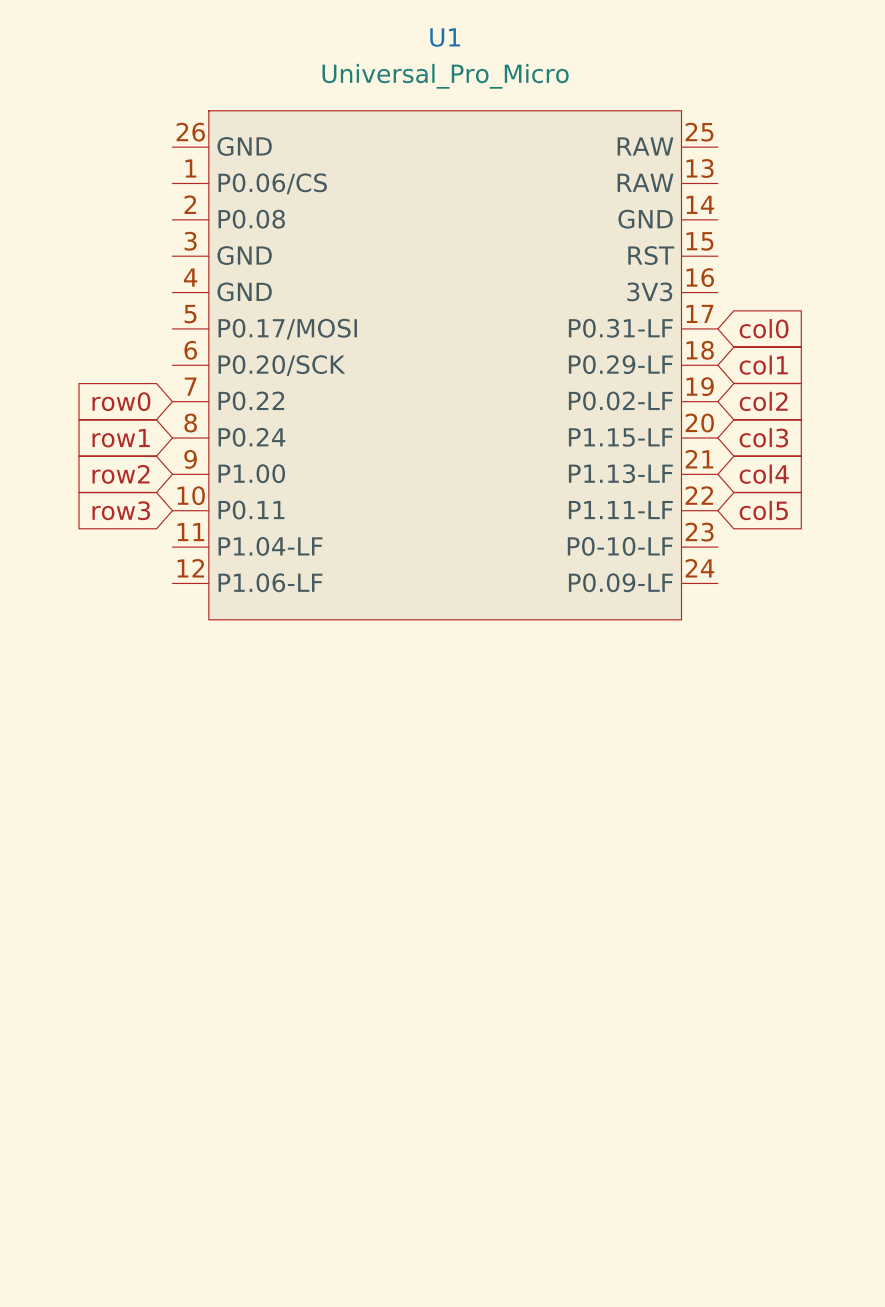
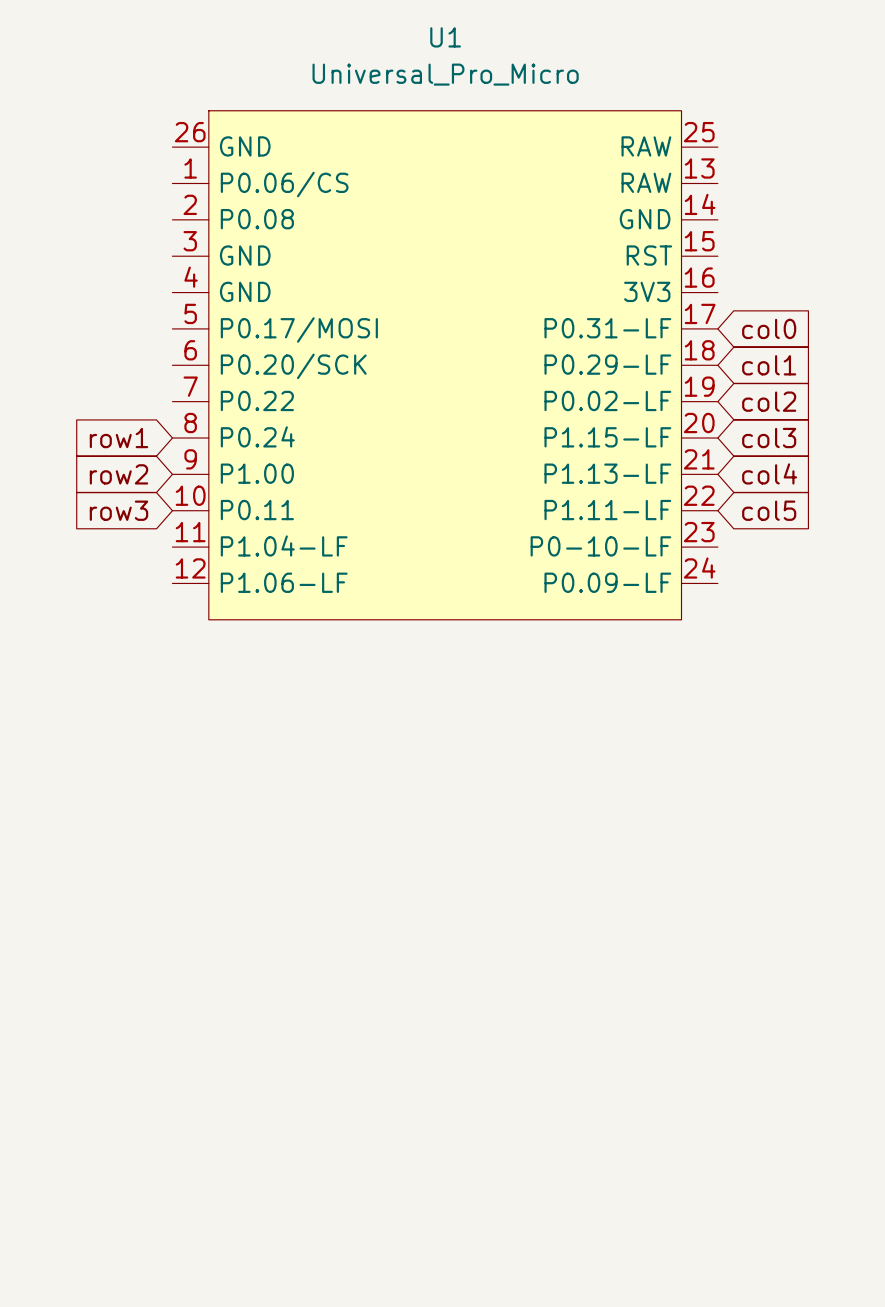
global label: row0 (121, 401) -> none

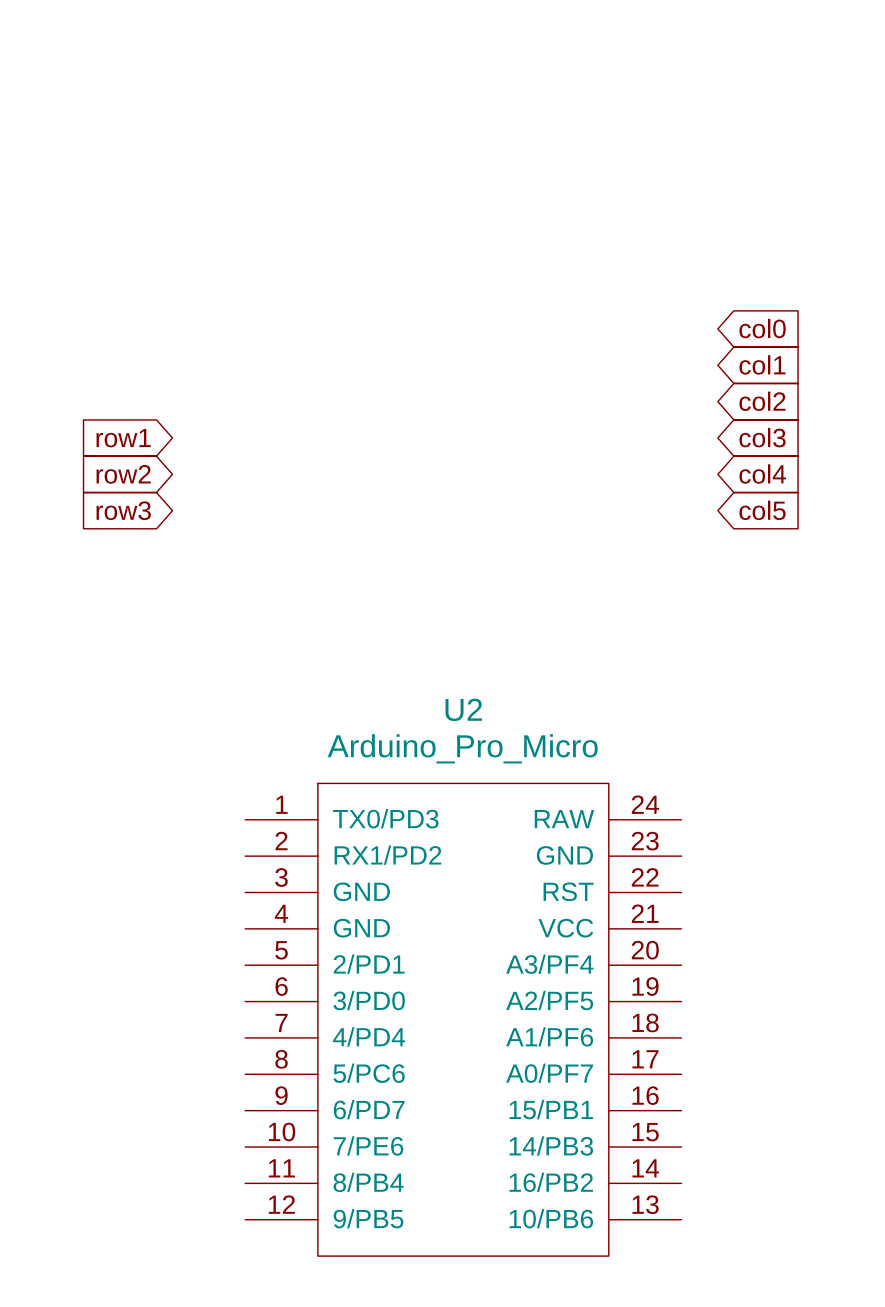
U1: Universal_Pro_Micro (445, 365) -> none
U2: none -> Arduino_Pro_Micro (463, 1019)

